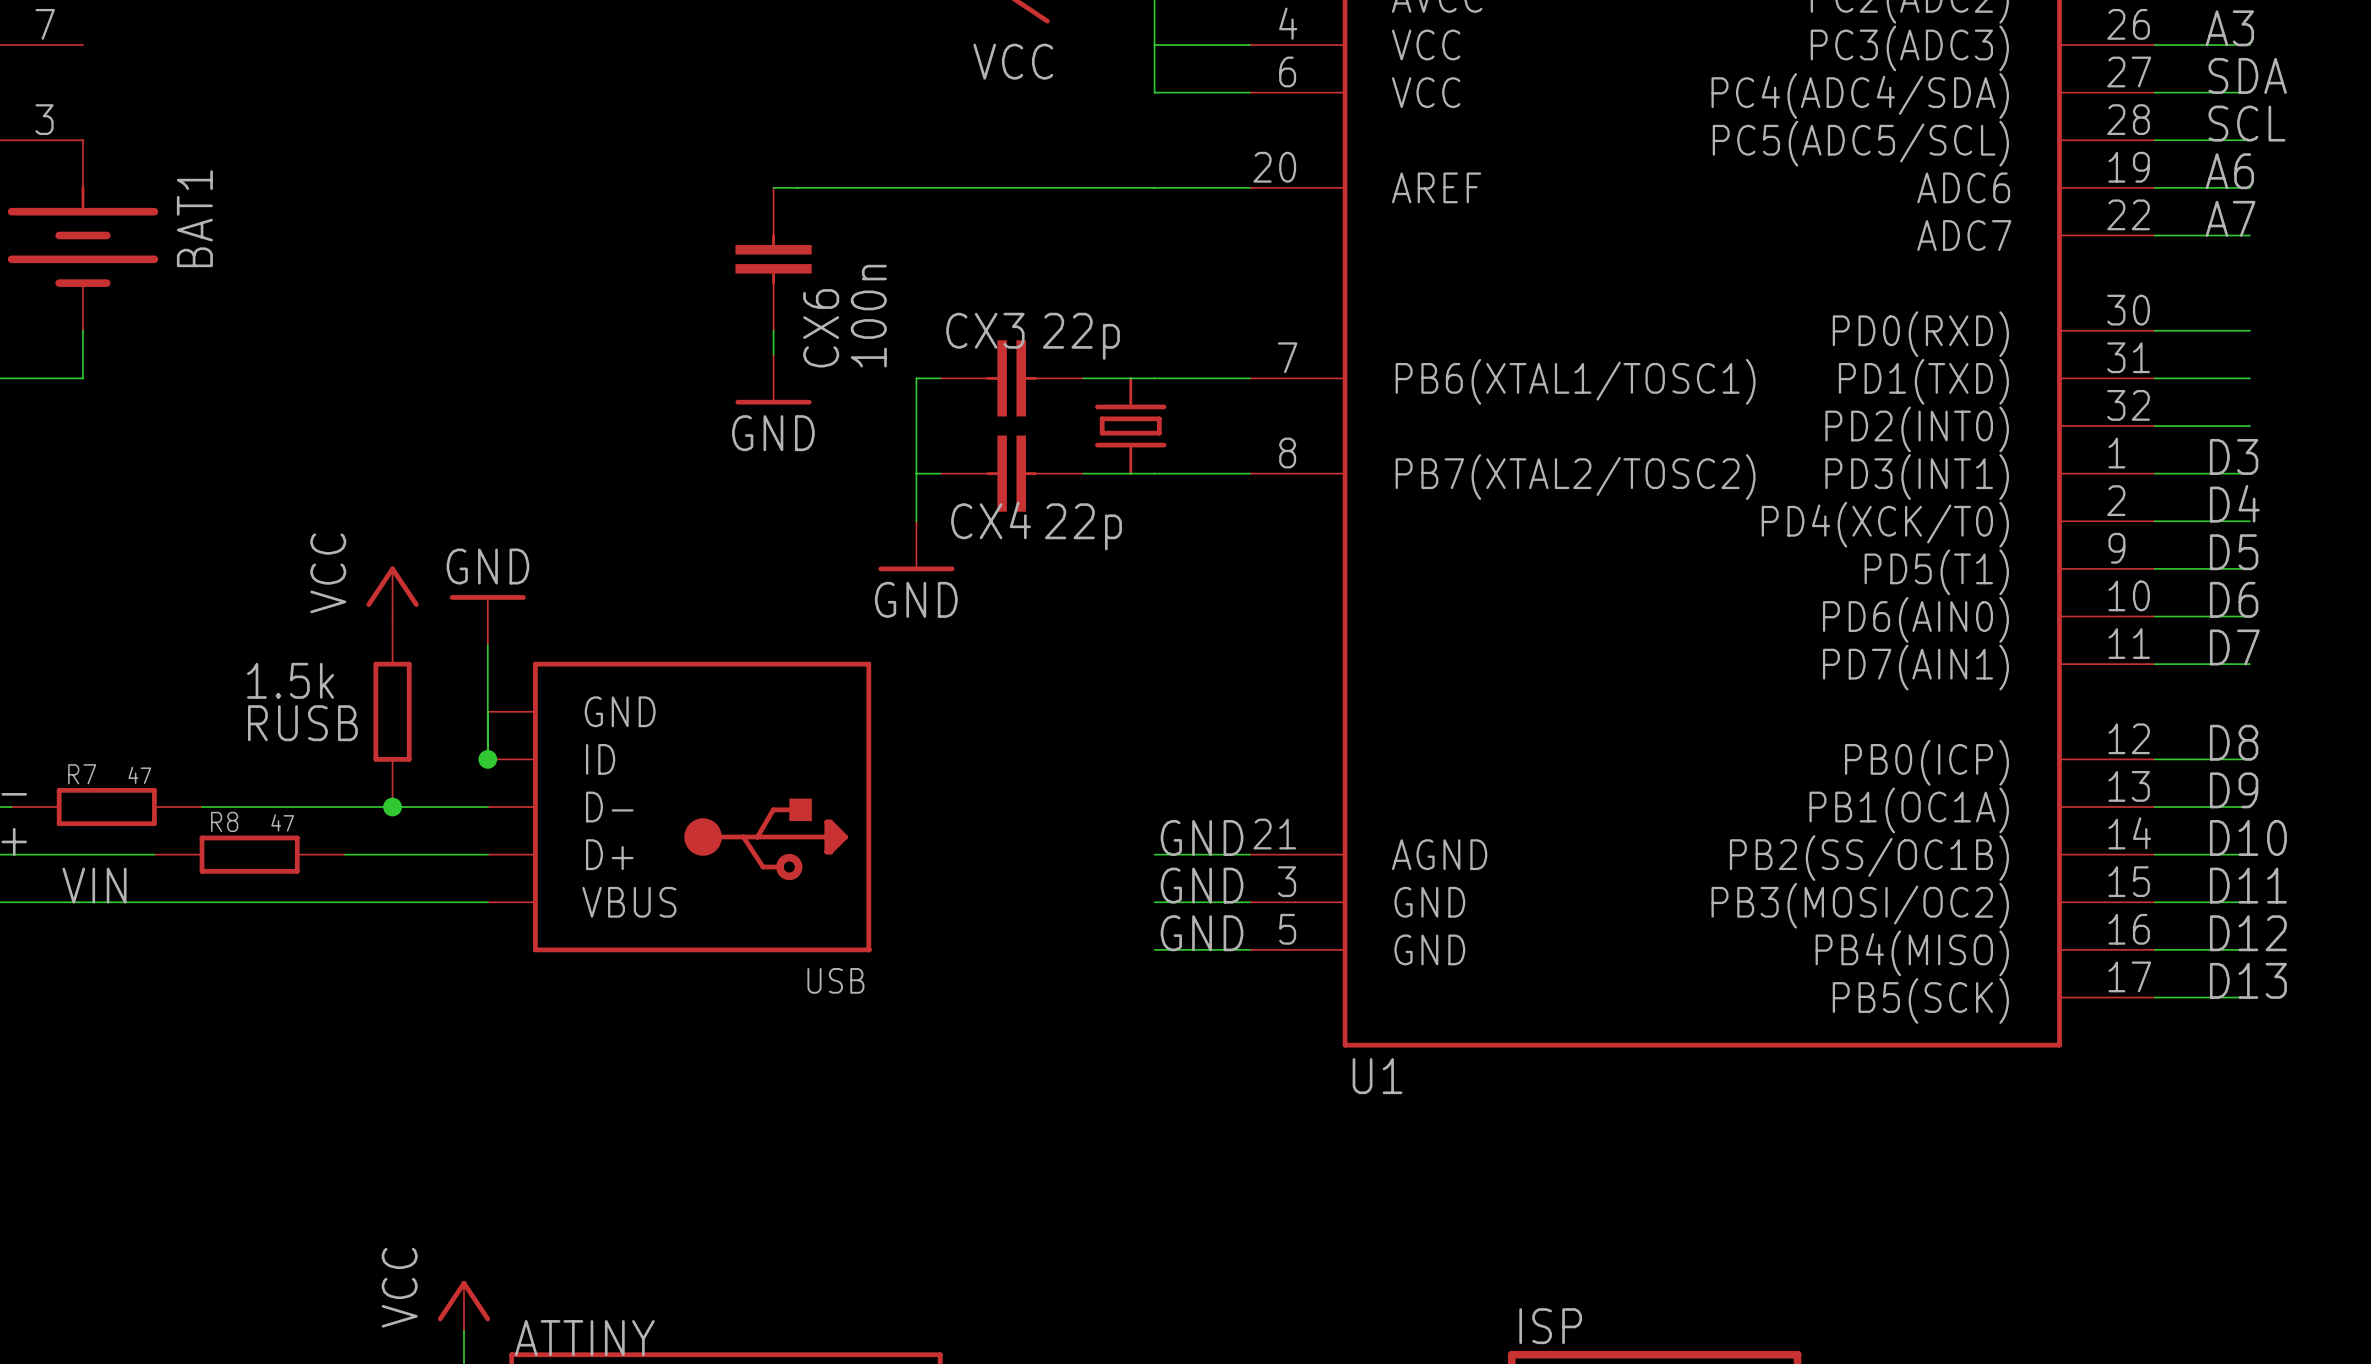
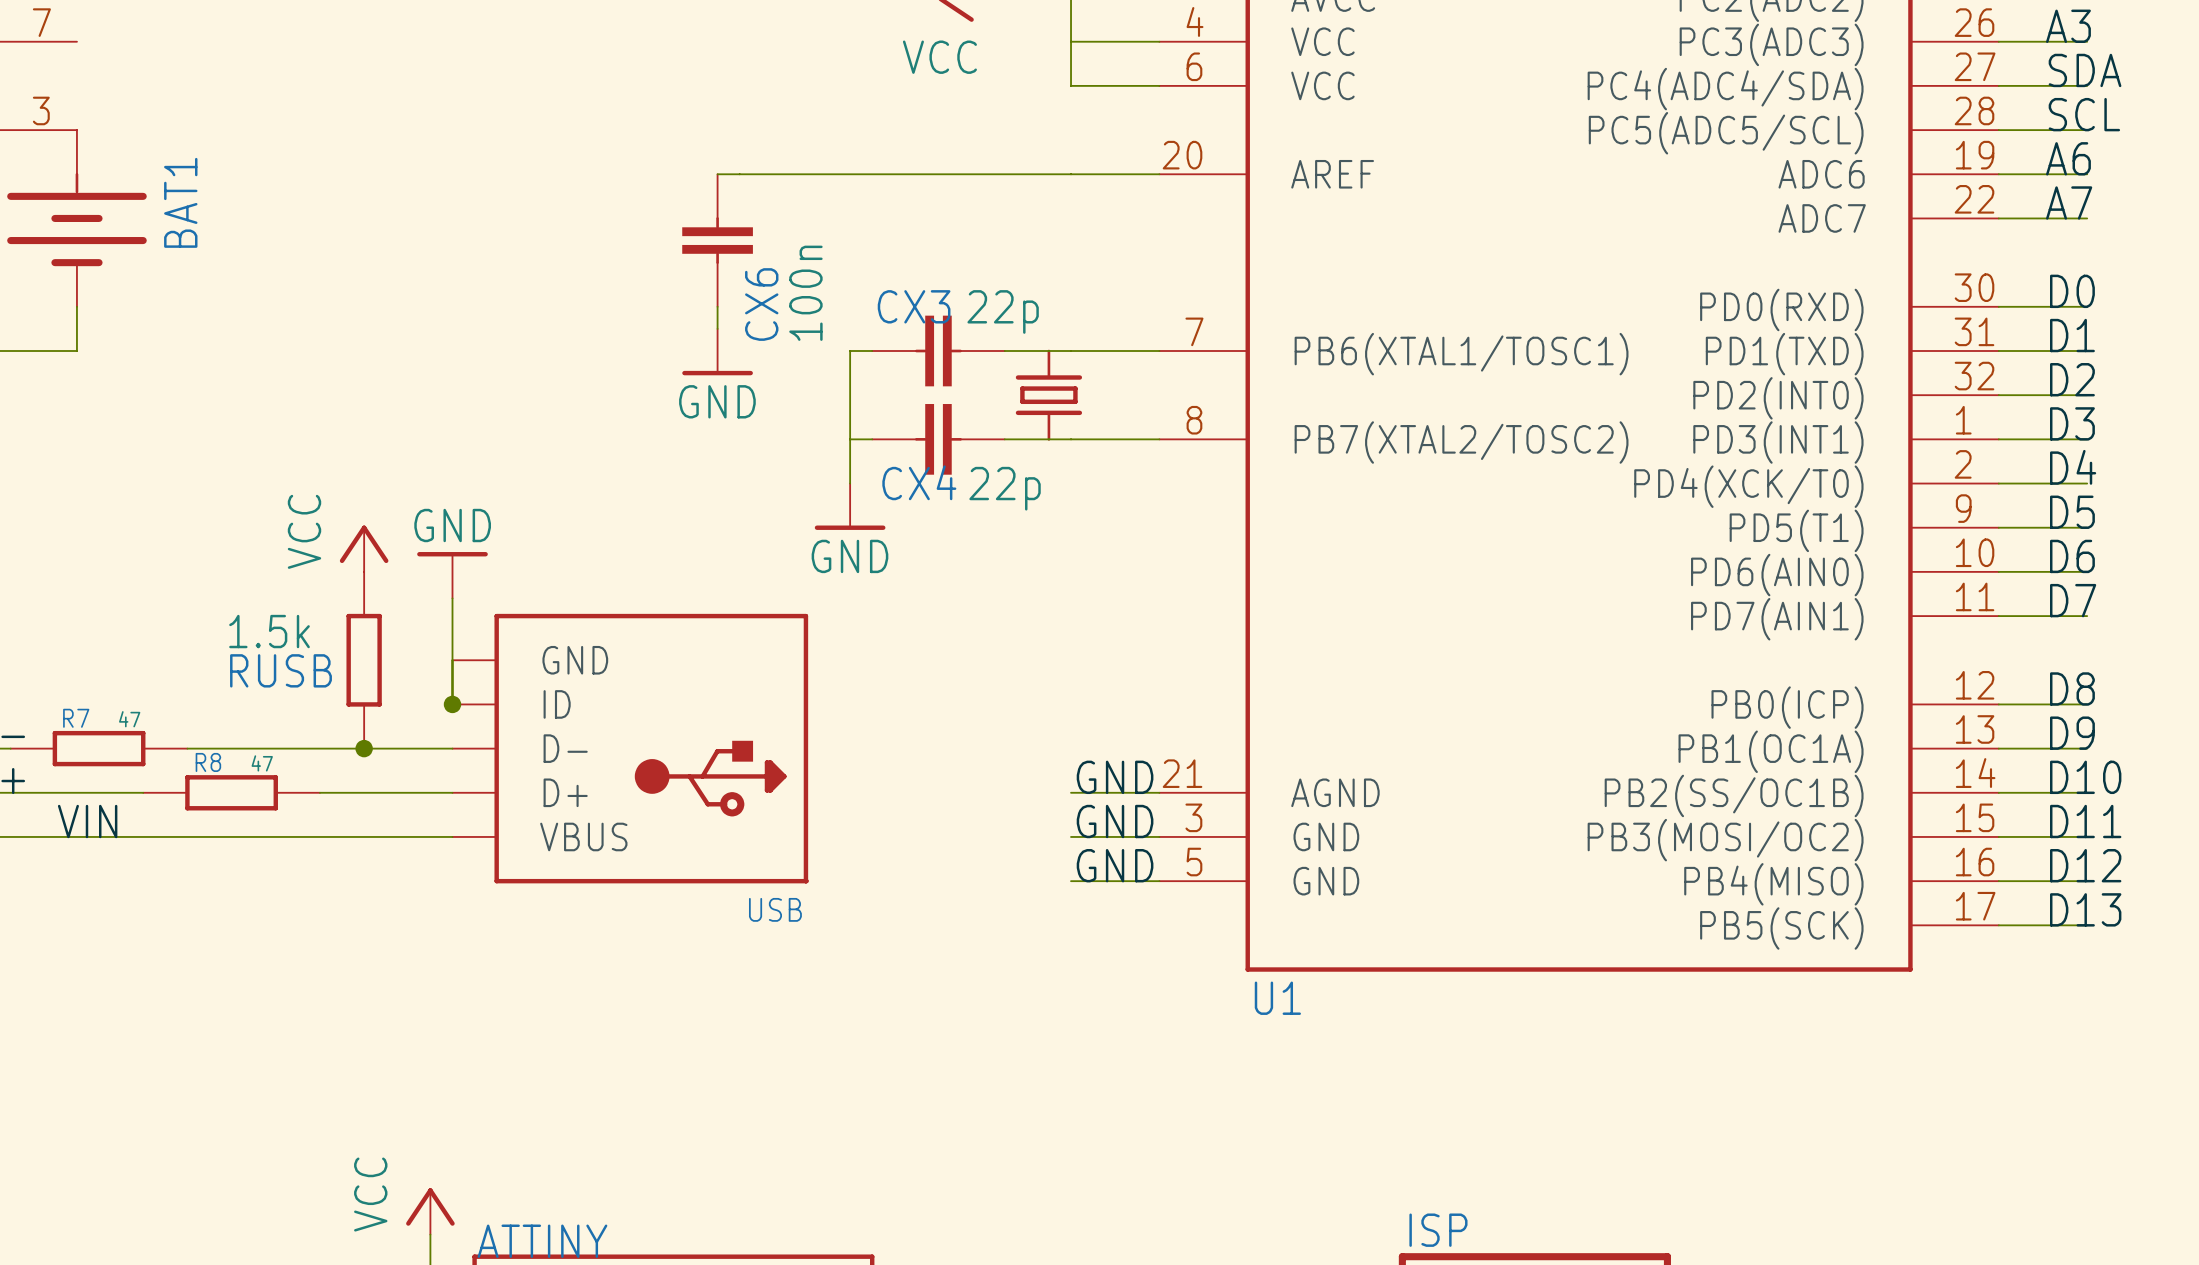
label: none -> D0 (2072, 291)
label: none -> D1 (2072, 335)
label: none -> D2 (2072, 379)

